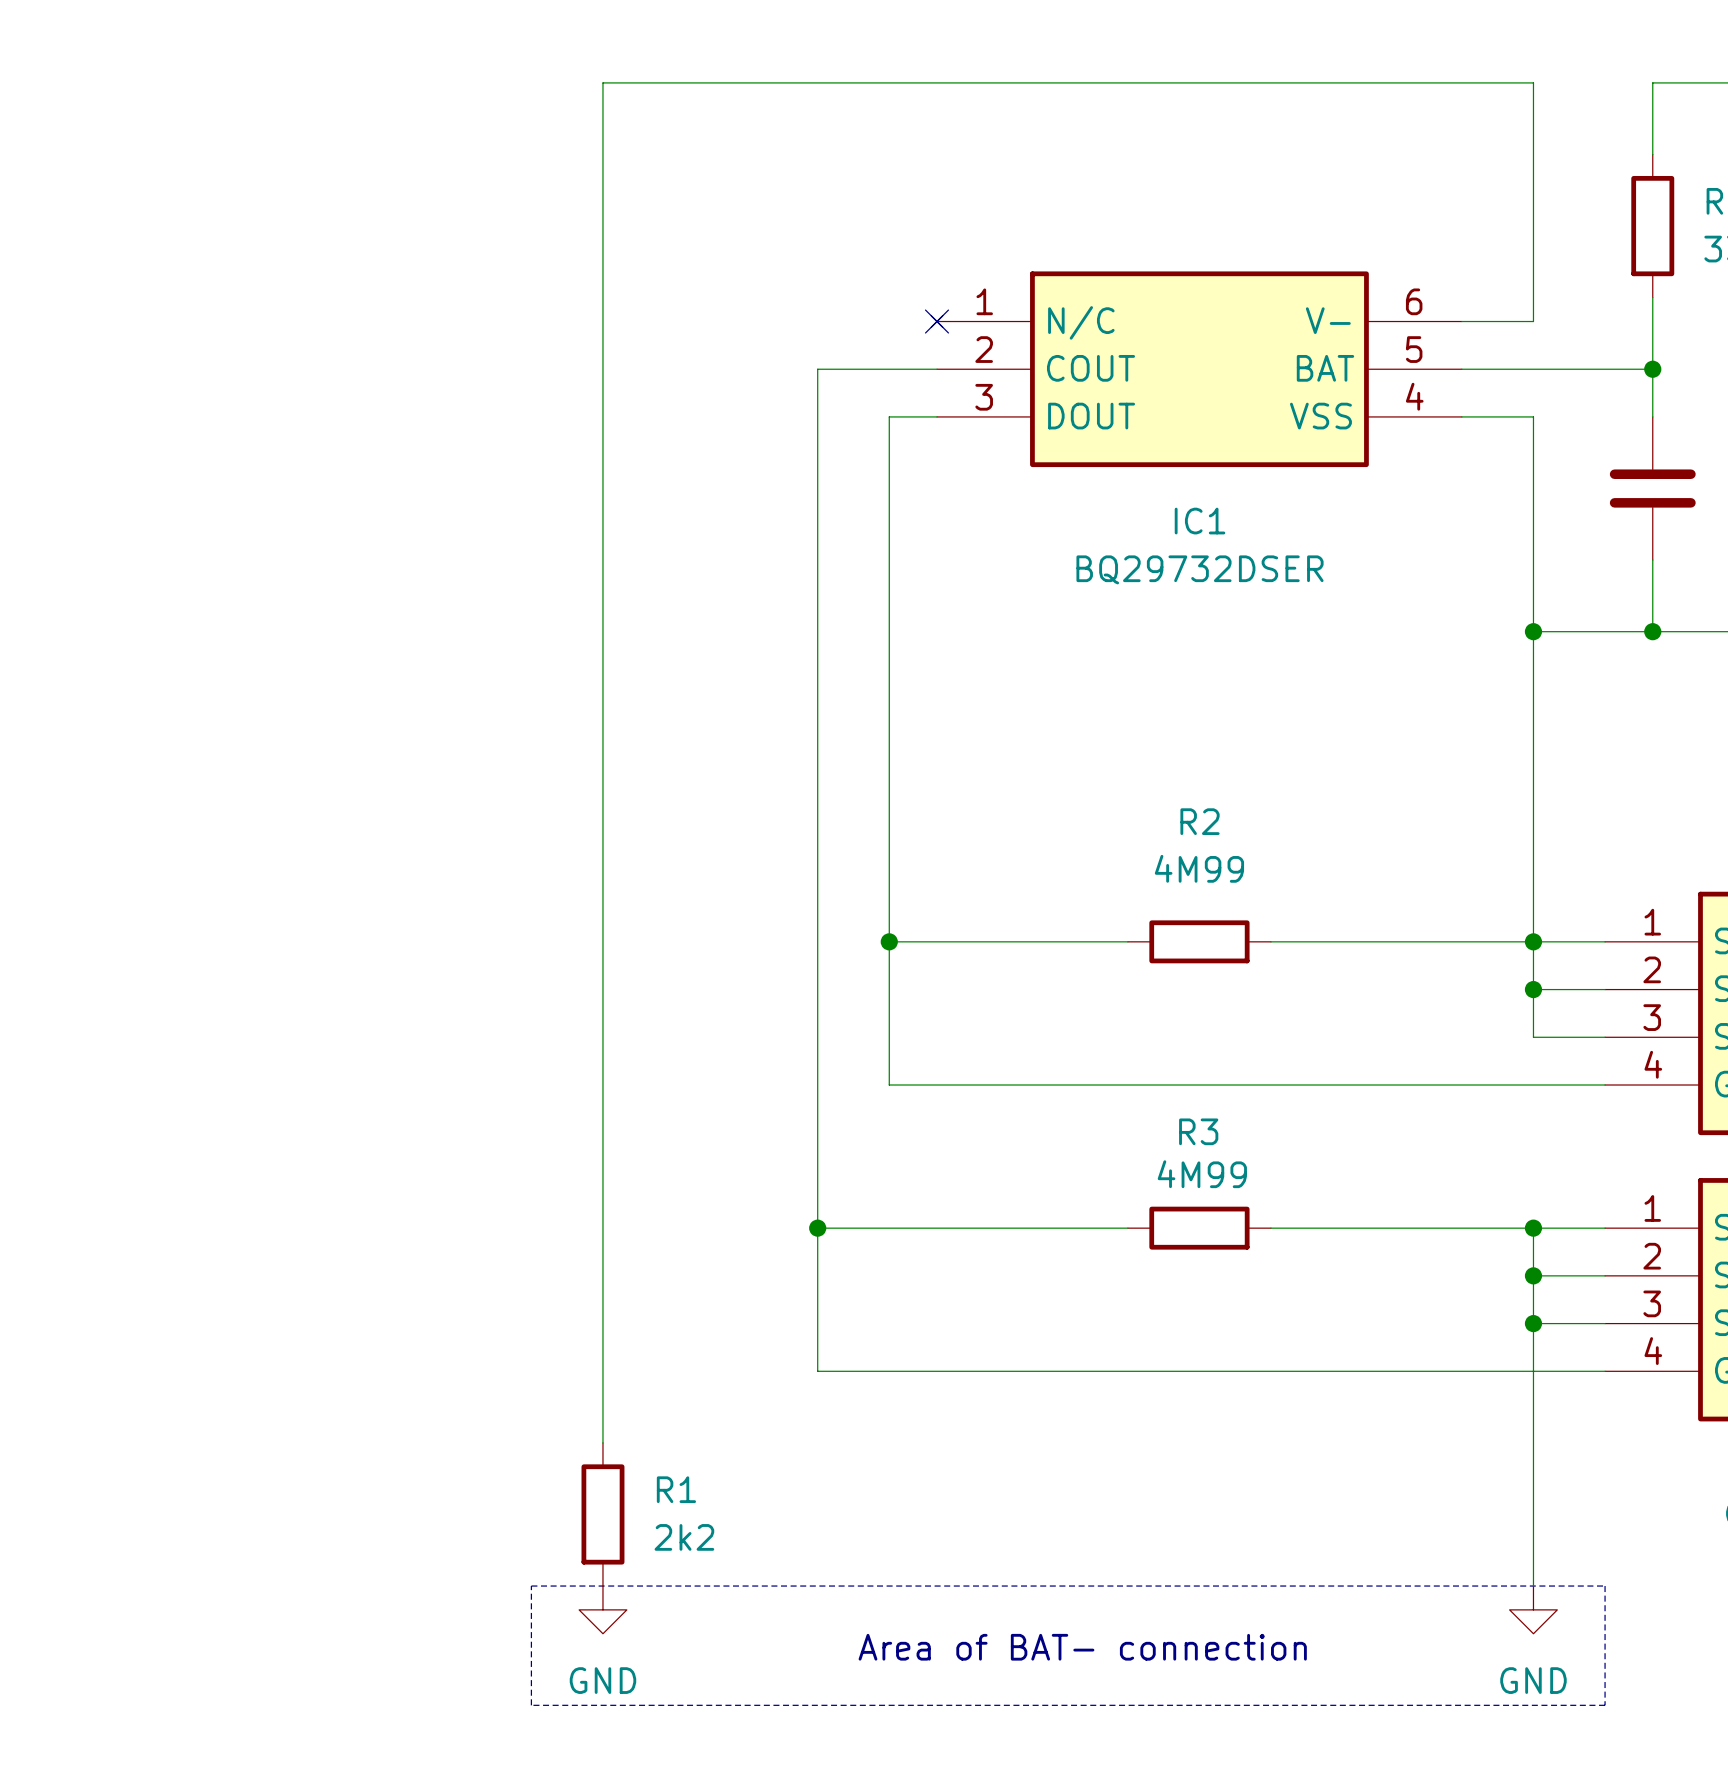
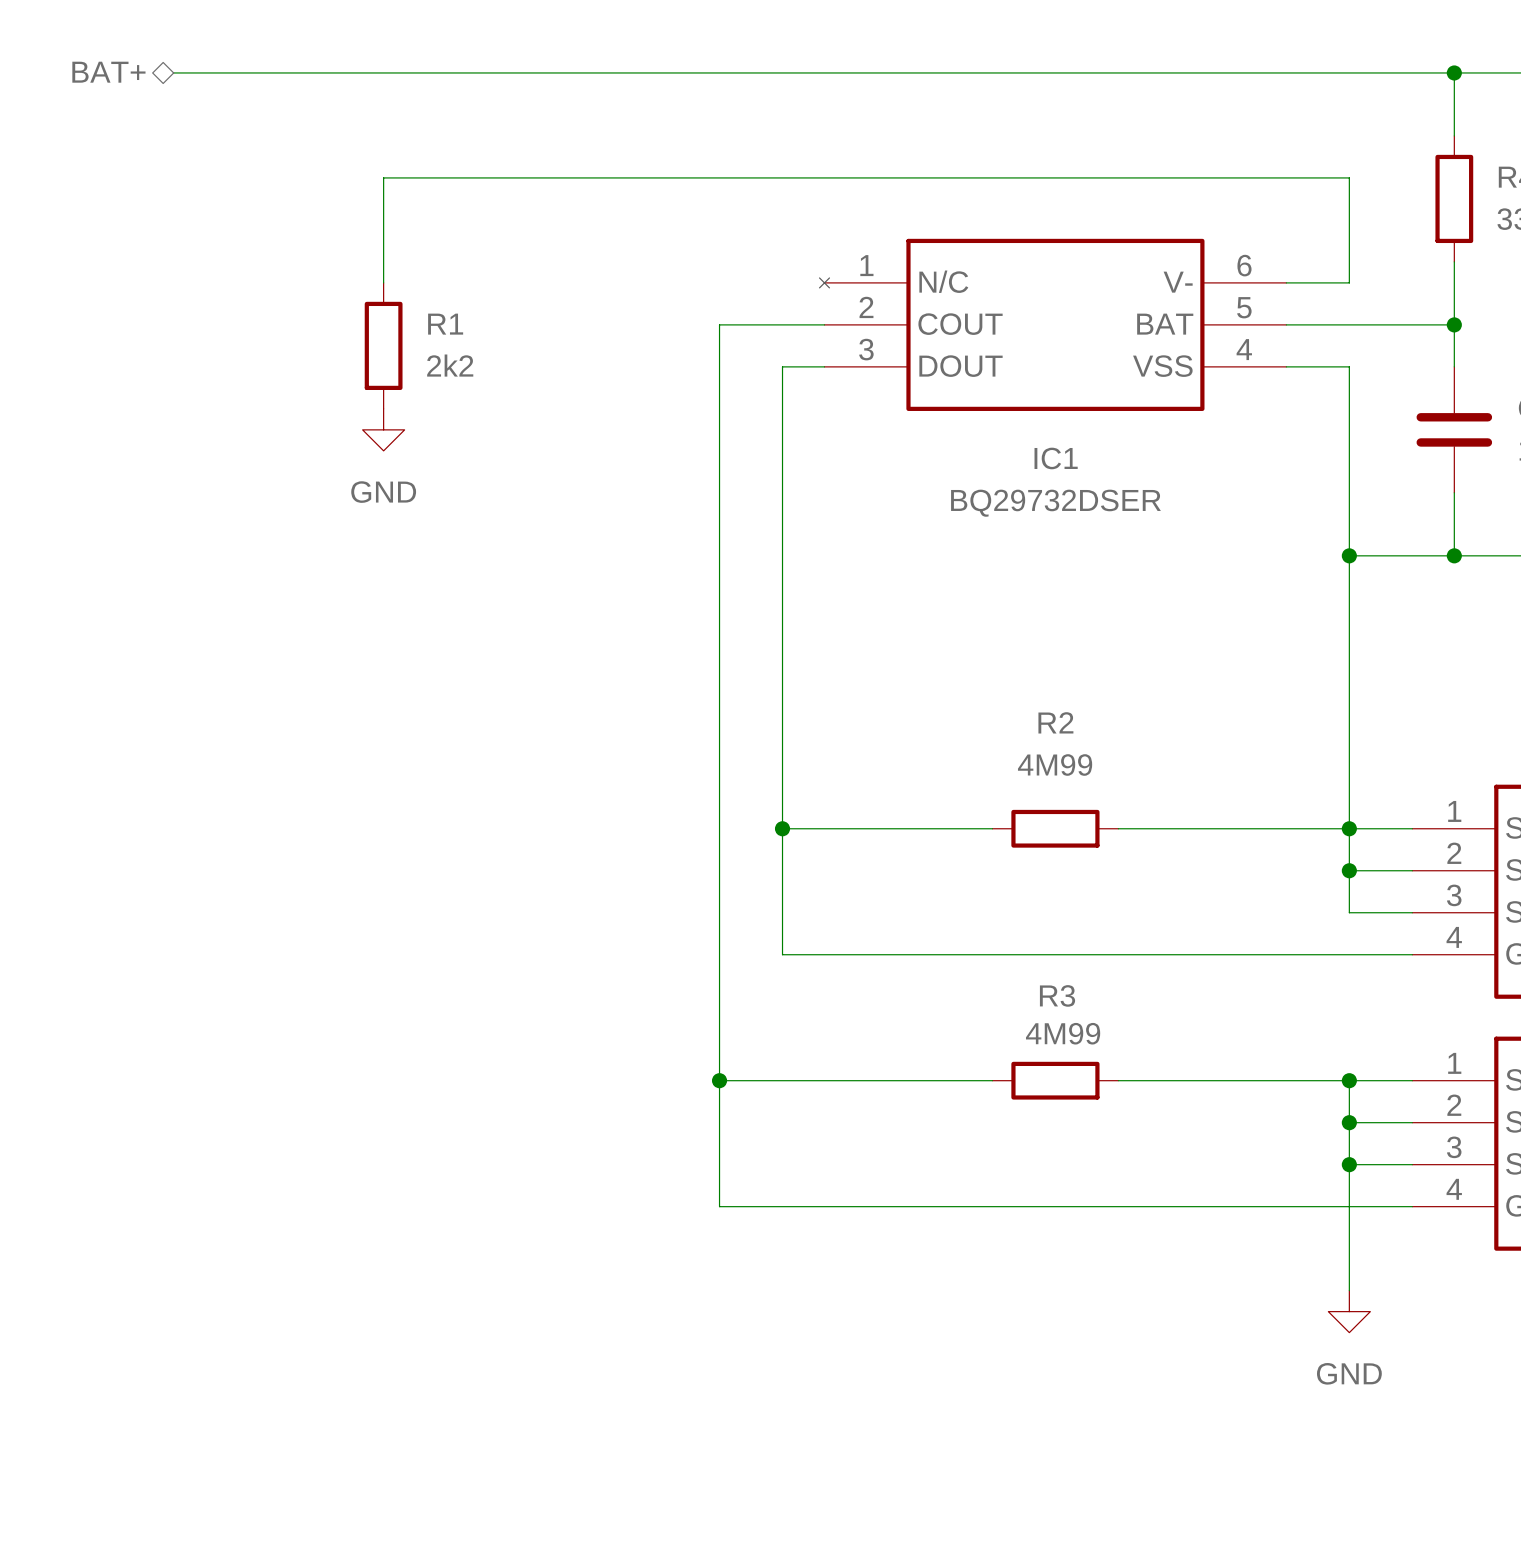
hierarchical label: none -> BAT+ (108, 72)
wire: (602, 82) (602, 1442) -> (530, 72) (173, 72)
wire: (1533, 82) (1533, 202) -> (1349, 72) (1454, 72)
junction: none -> (1454, 72)
wire: none -> (1349, 177) (383, 177) (383, 282)
no-connect mark: (937, 321) -> none
power symbol: none -> GND (383, 429)
wire: (1533, 1466) (1533, 1586) -> none
R1 position: (602, 1514) -> (383, 345)
line: (531, 1586) (1605, 1586) (1605, 1705) (531, 1705) (531, 1586) -> none
power symbol: GND (602, 1609) -> none
power symbol position: GND (1533, 1609) -> GND (1349, 1311)
text: Area of BAT- connection (1082, 1647) -> none

